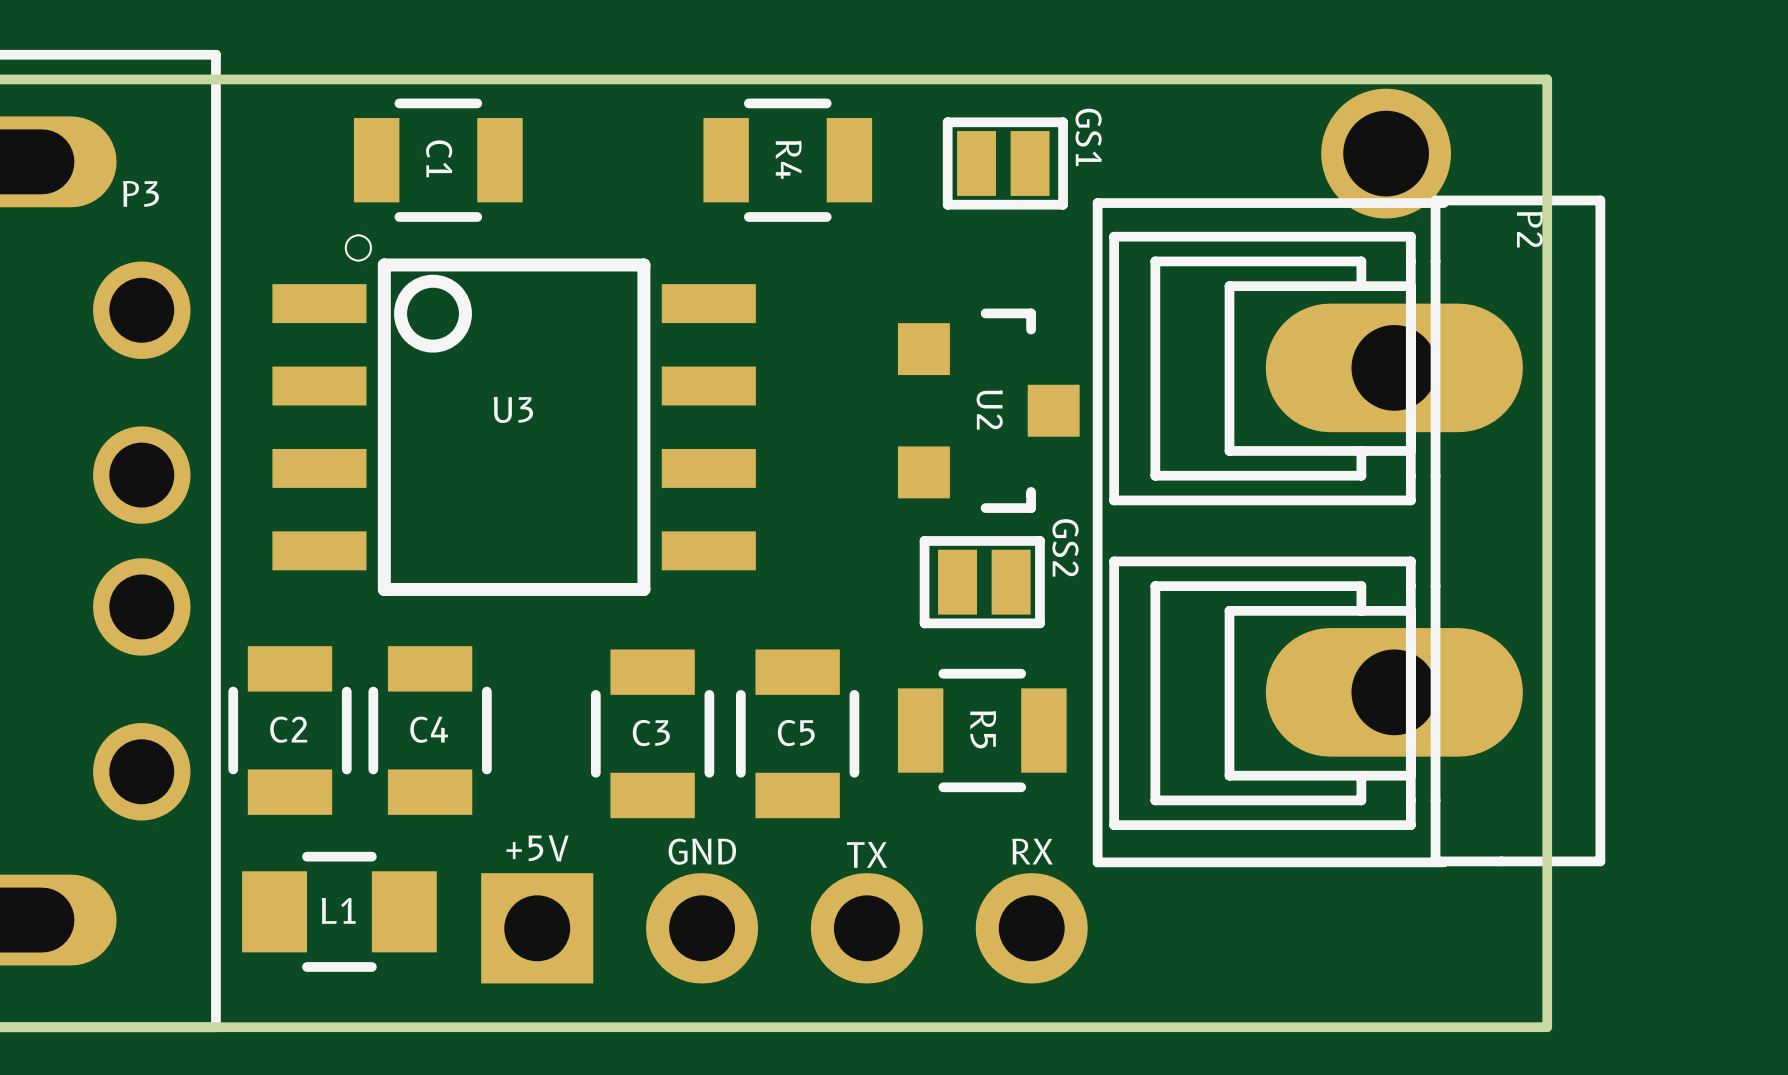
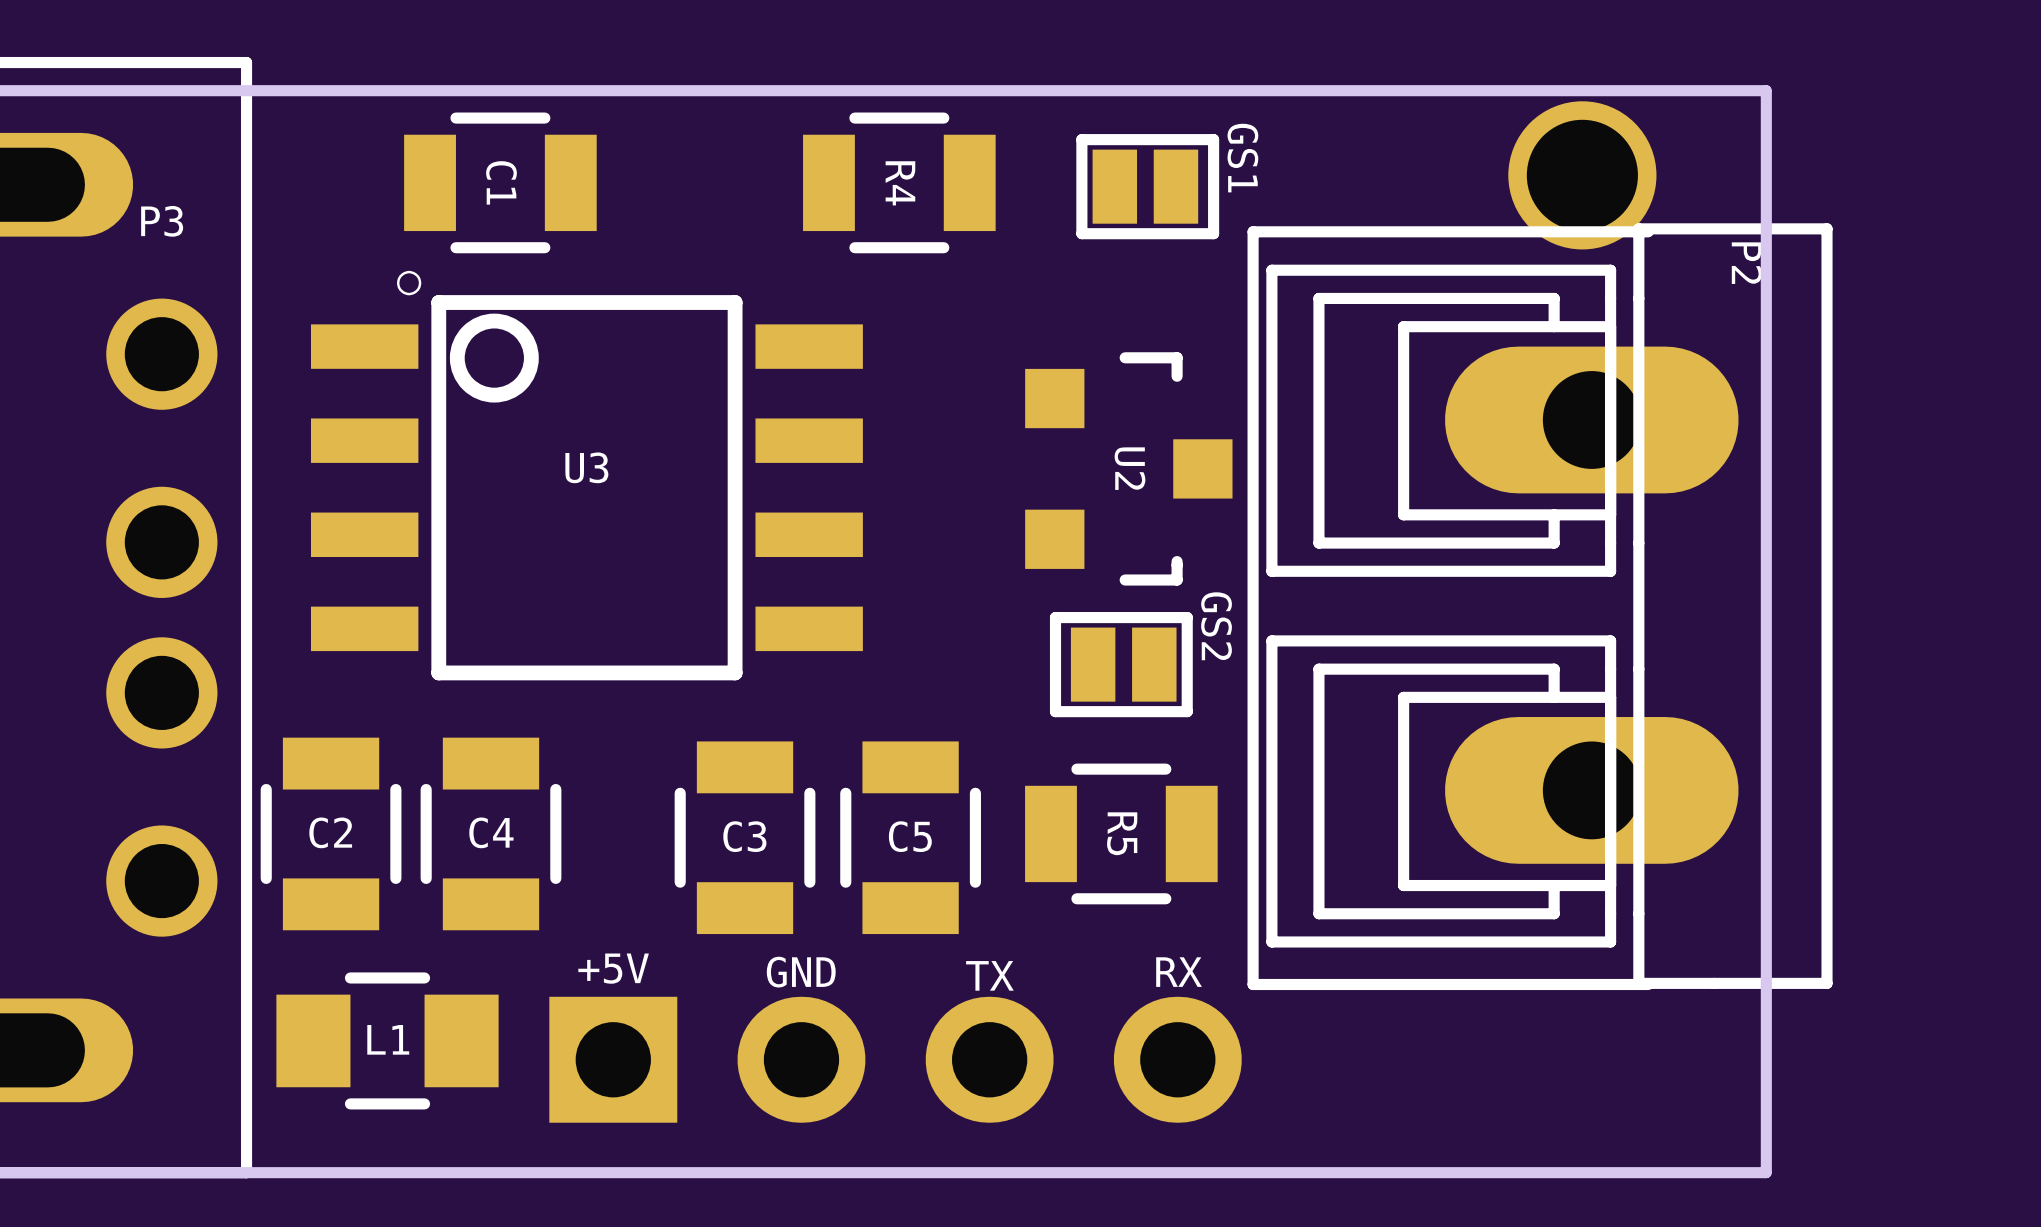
part footprint: [1321, 88, 1451, 219] -> [1508, 101, 1657, 250]

